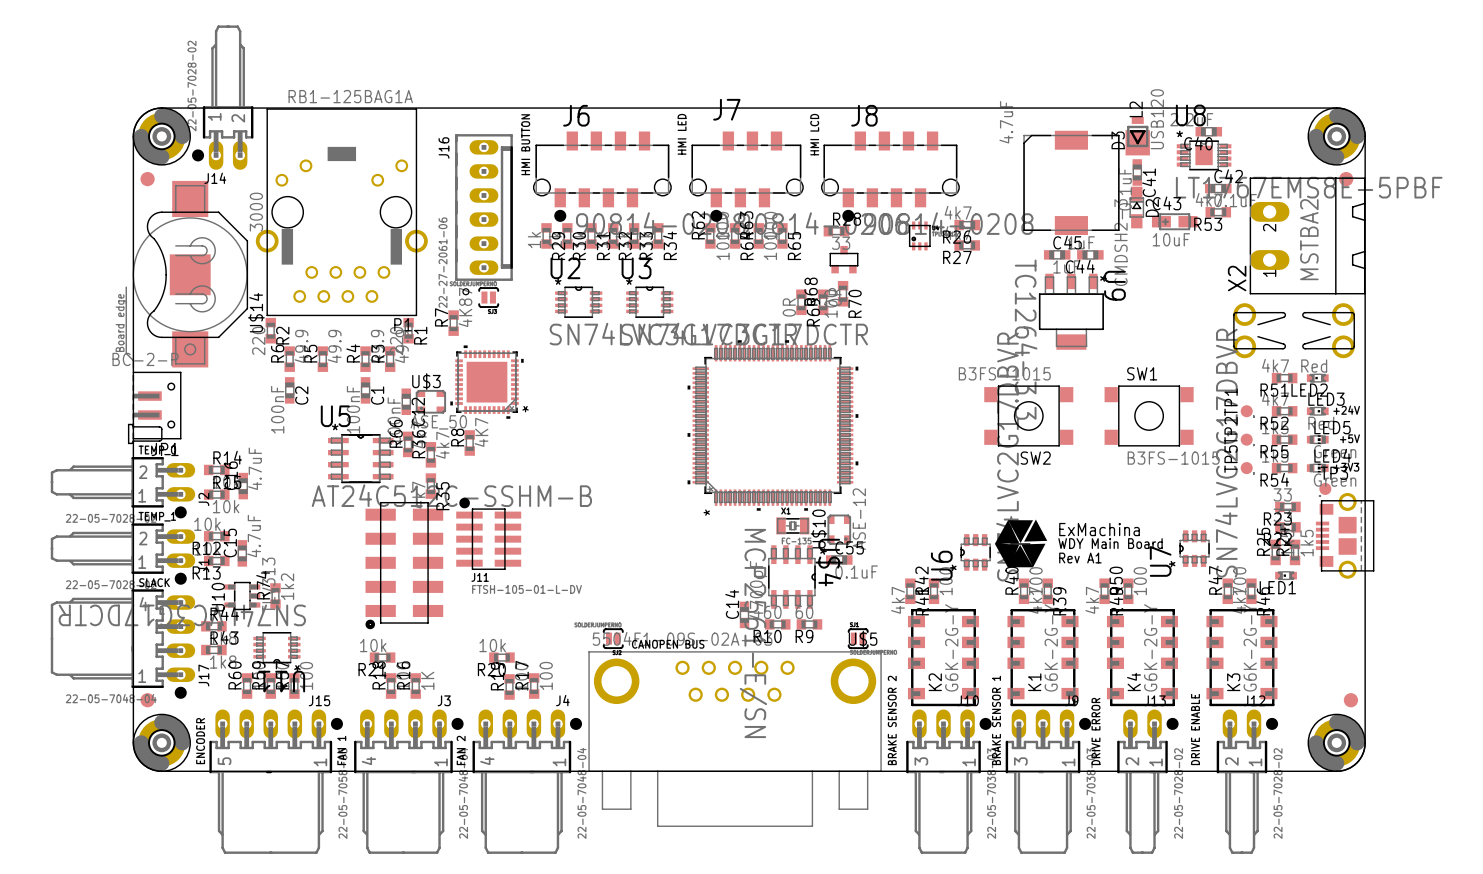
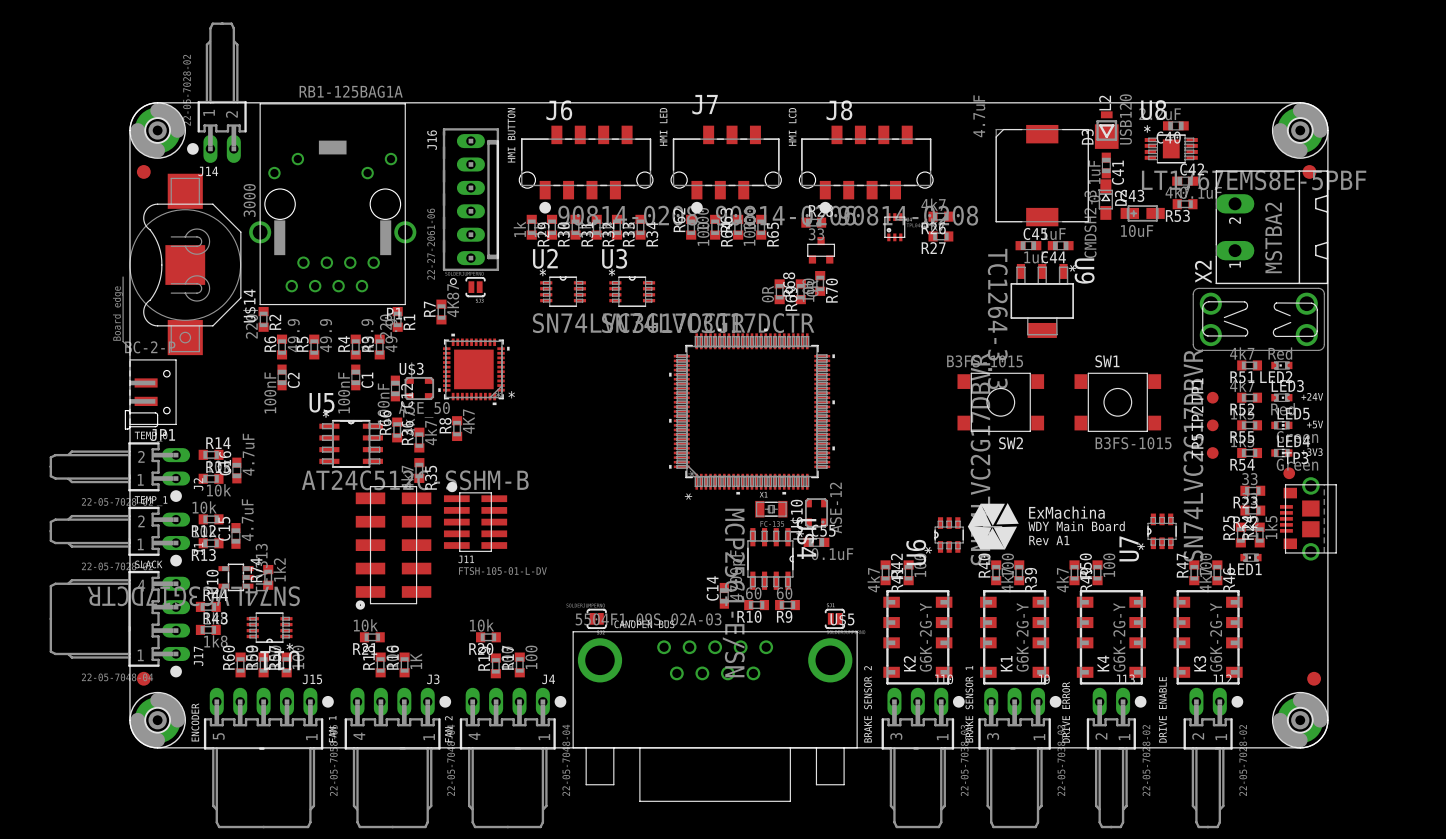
part footprint: [1233, 303, 1355, 359] -> [1192, 287, 1325, 351]
U$5 footprint: [588, 651, 882, 827] -> [572, 631, 858, 802]

